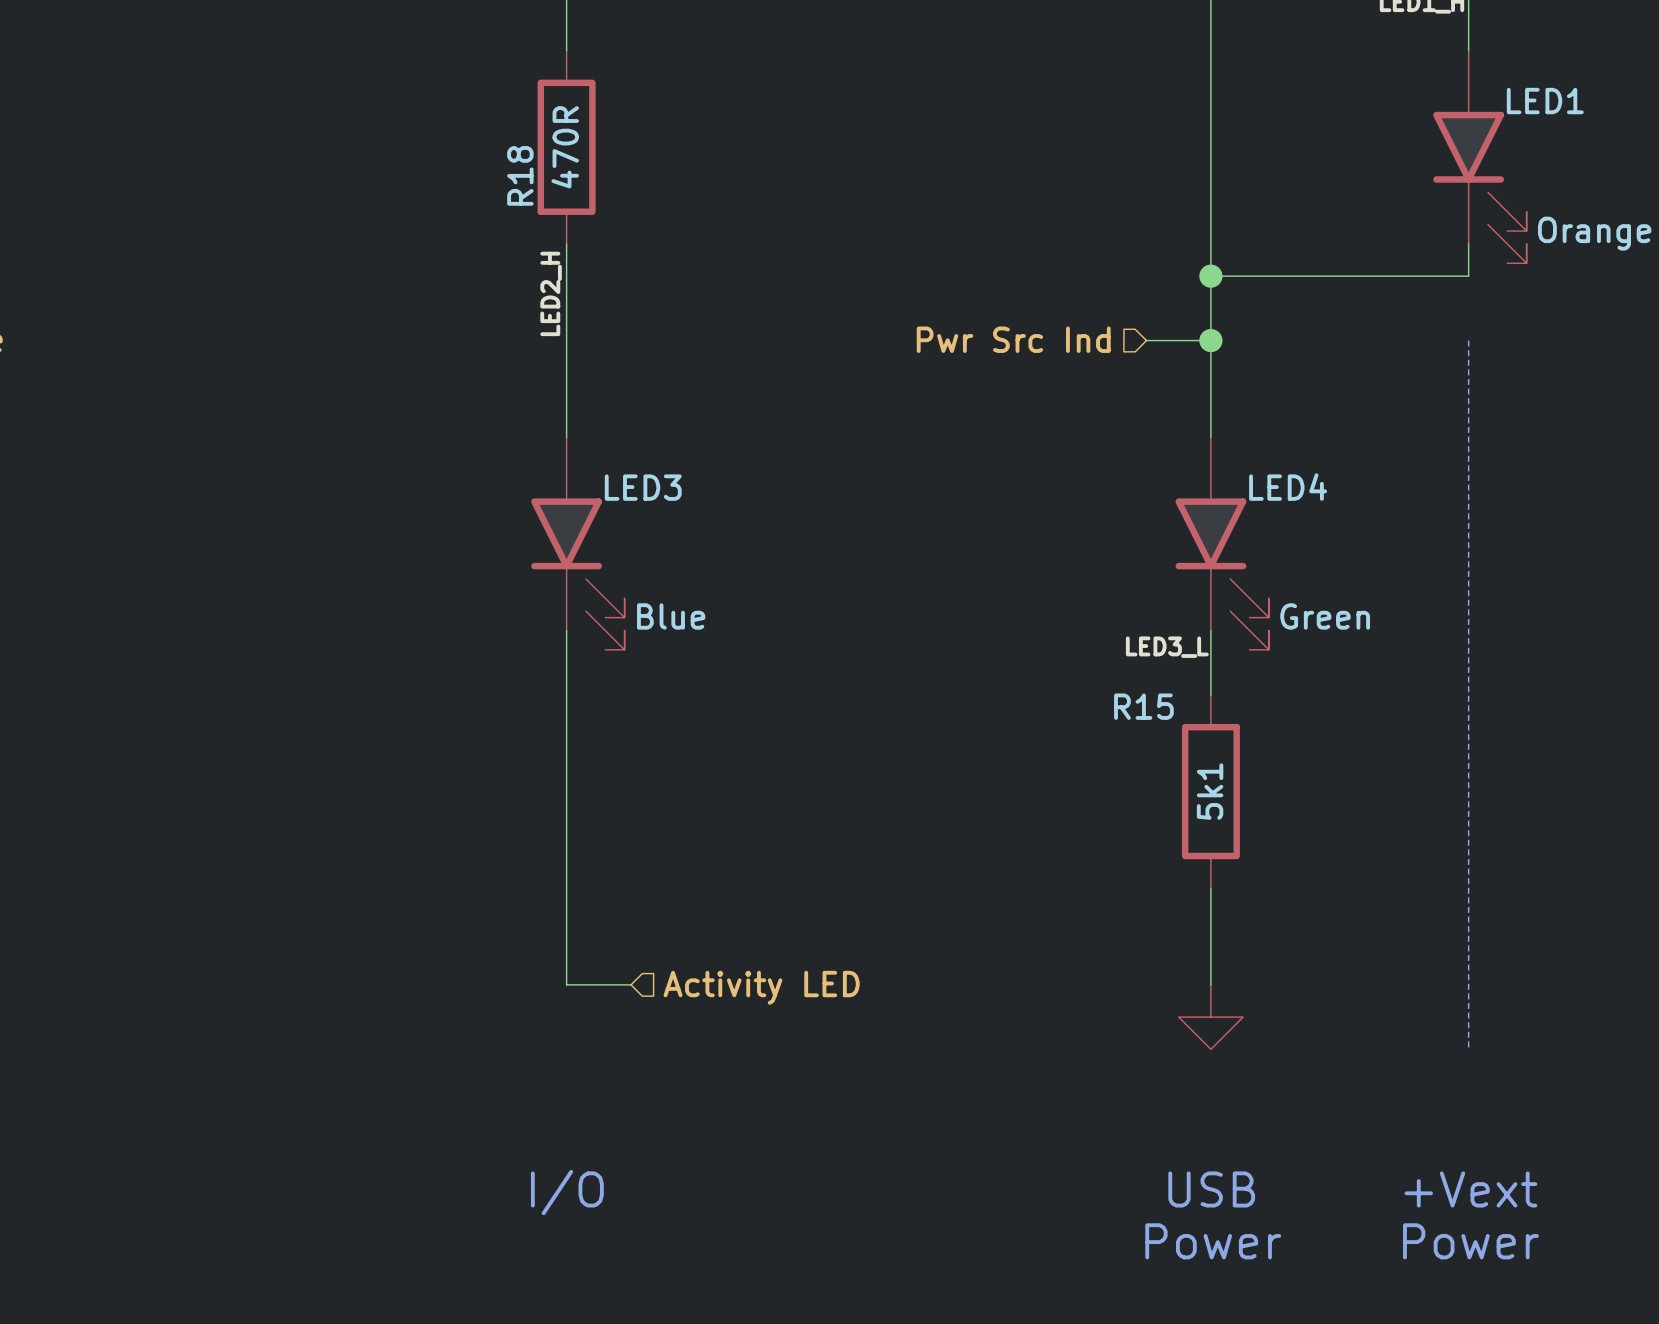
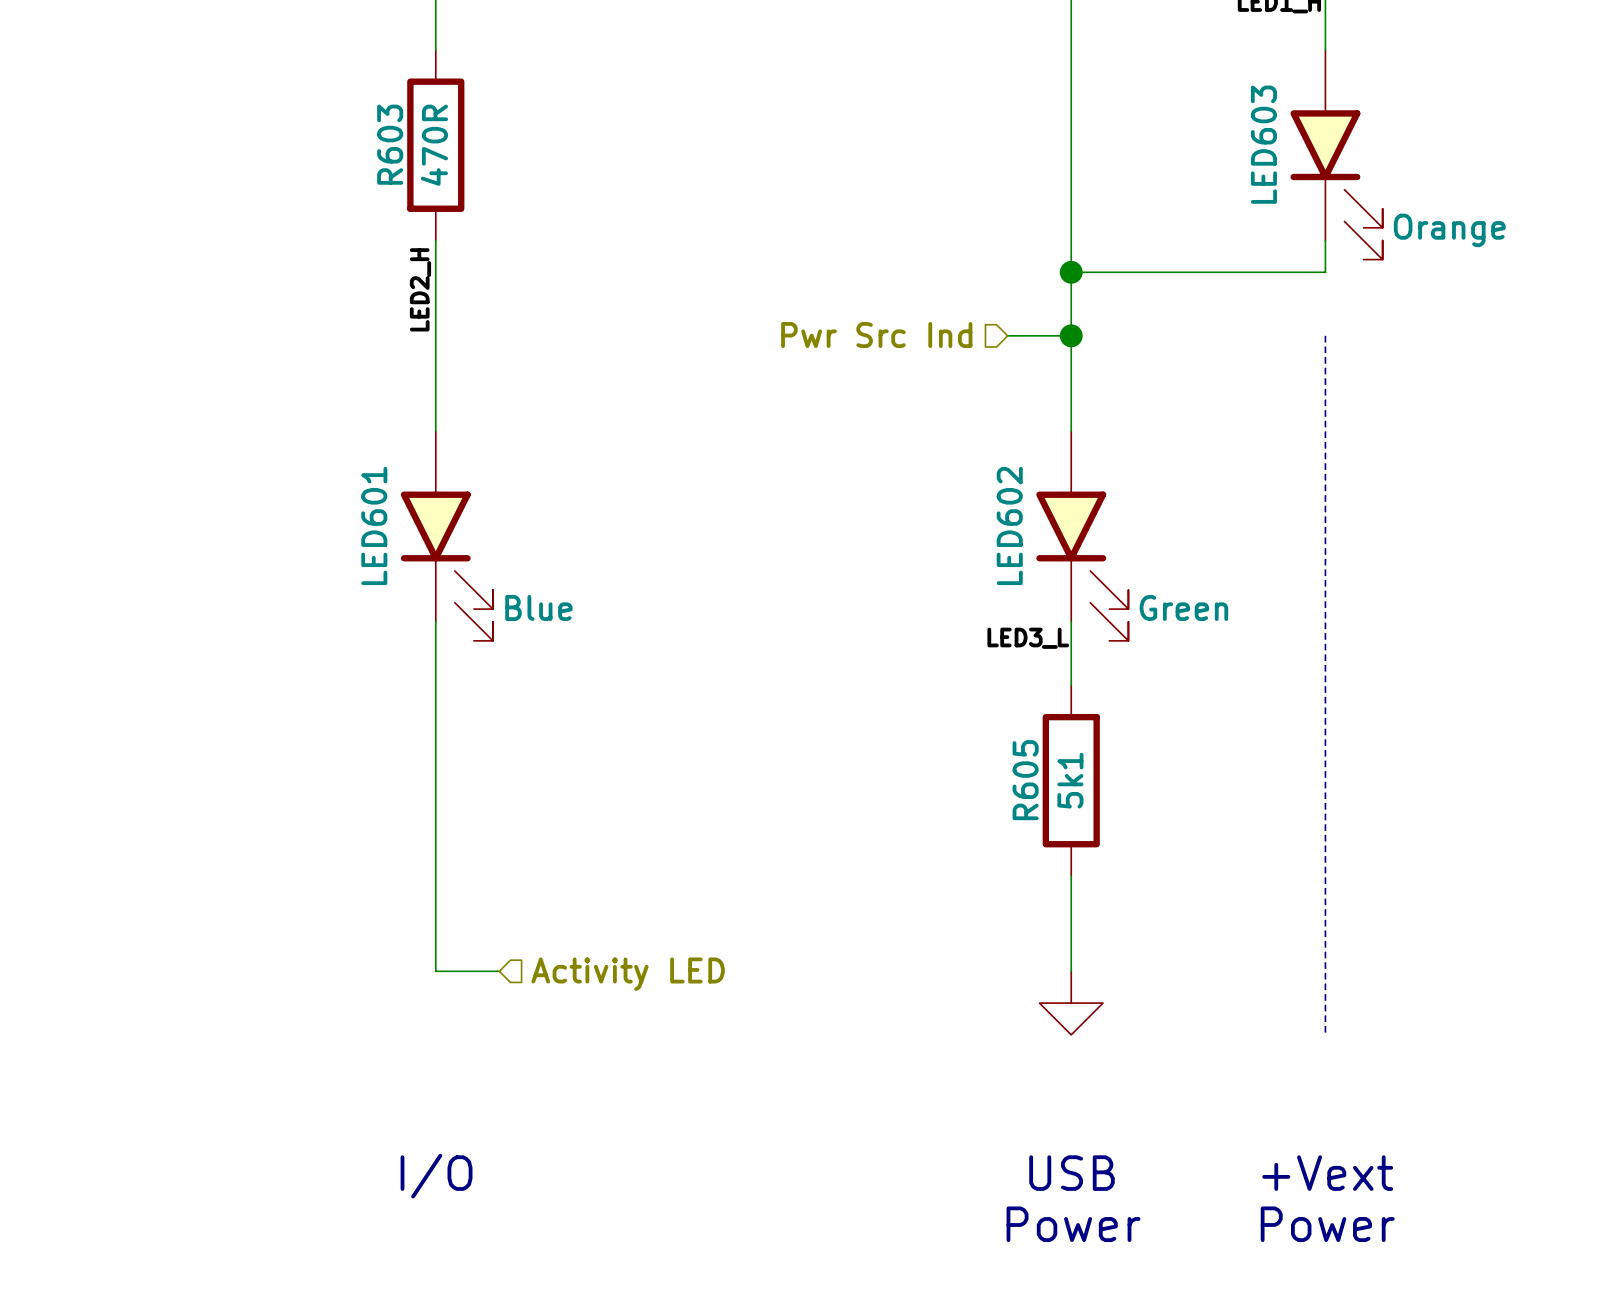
LED1 name: LED1 (1545, 101) -> LED603 (1263, 144)
R18 name: R18 (520, 175) -> R603 (390, 144)
LED3 name: LED3 (643, 487) -> LED601 (374, 525)
LED4 name: LED4 (1288, 487) -> LED602 (1009, 525)
R15 name: R15 (1143, 706) -> R605 (1025, 780)

